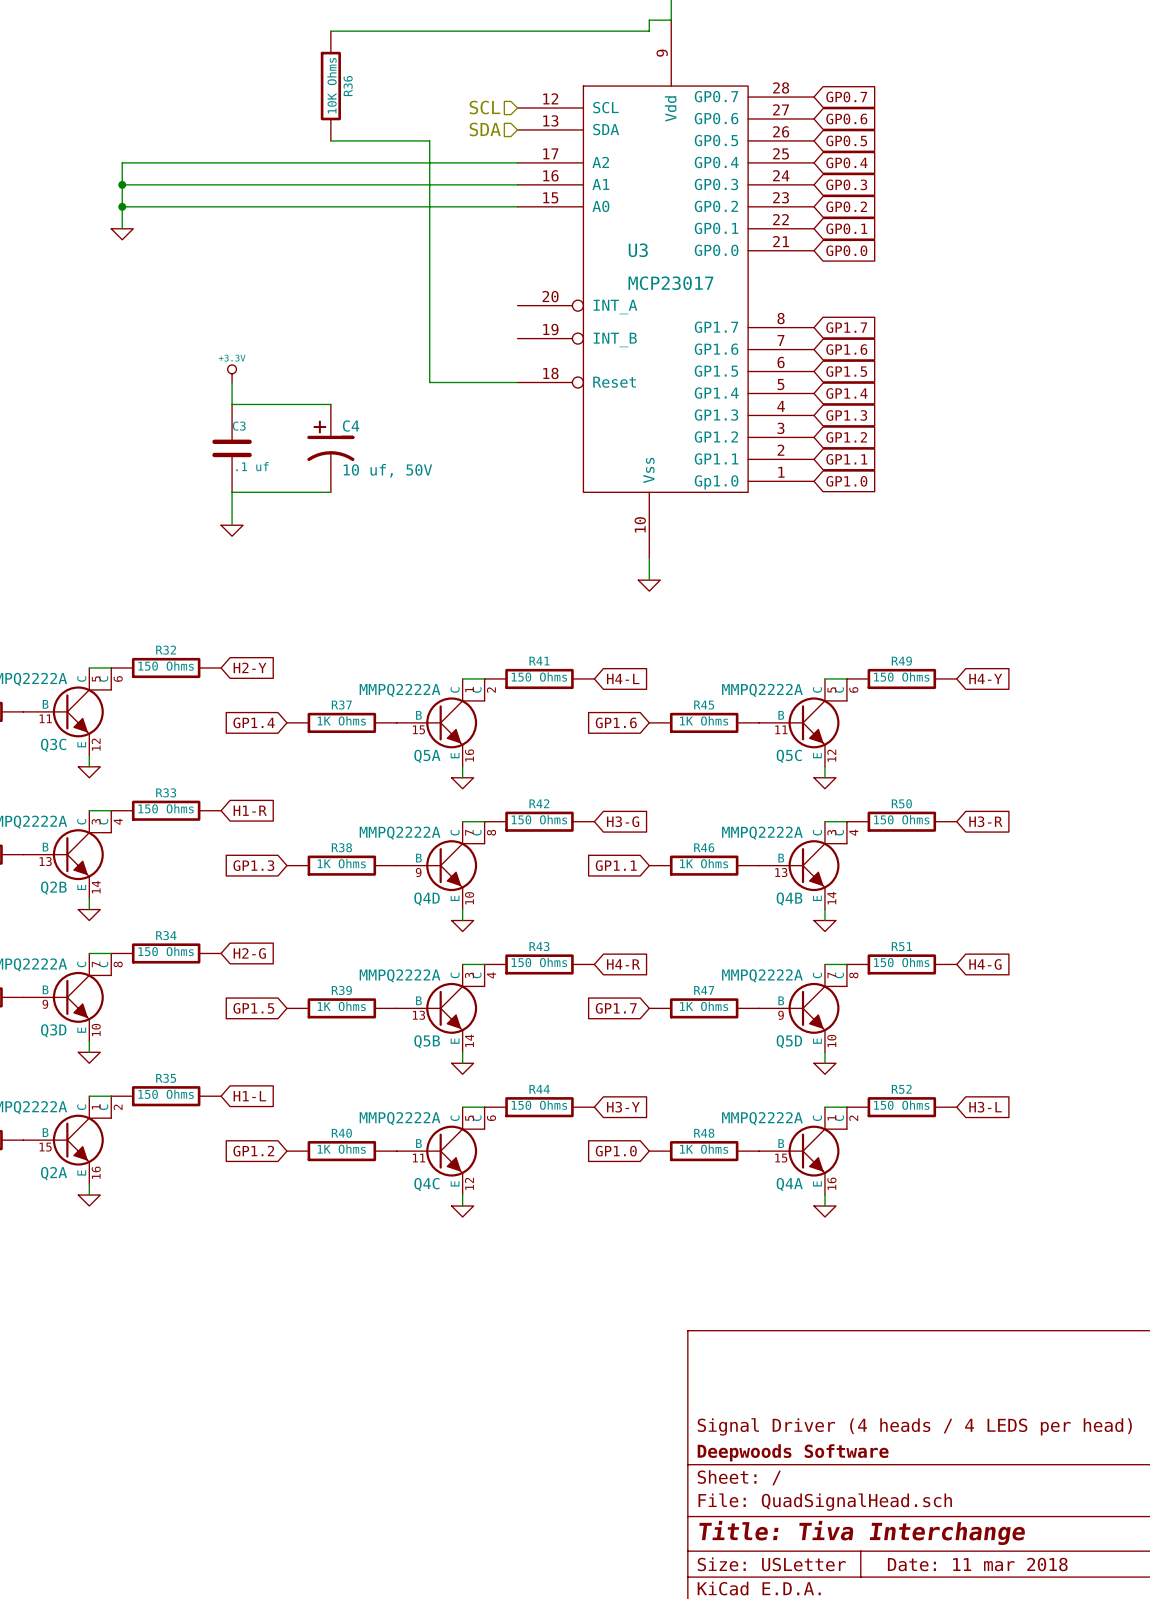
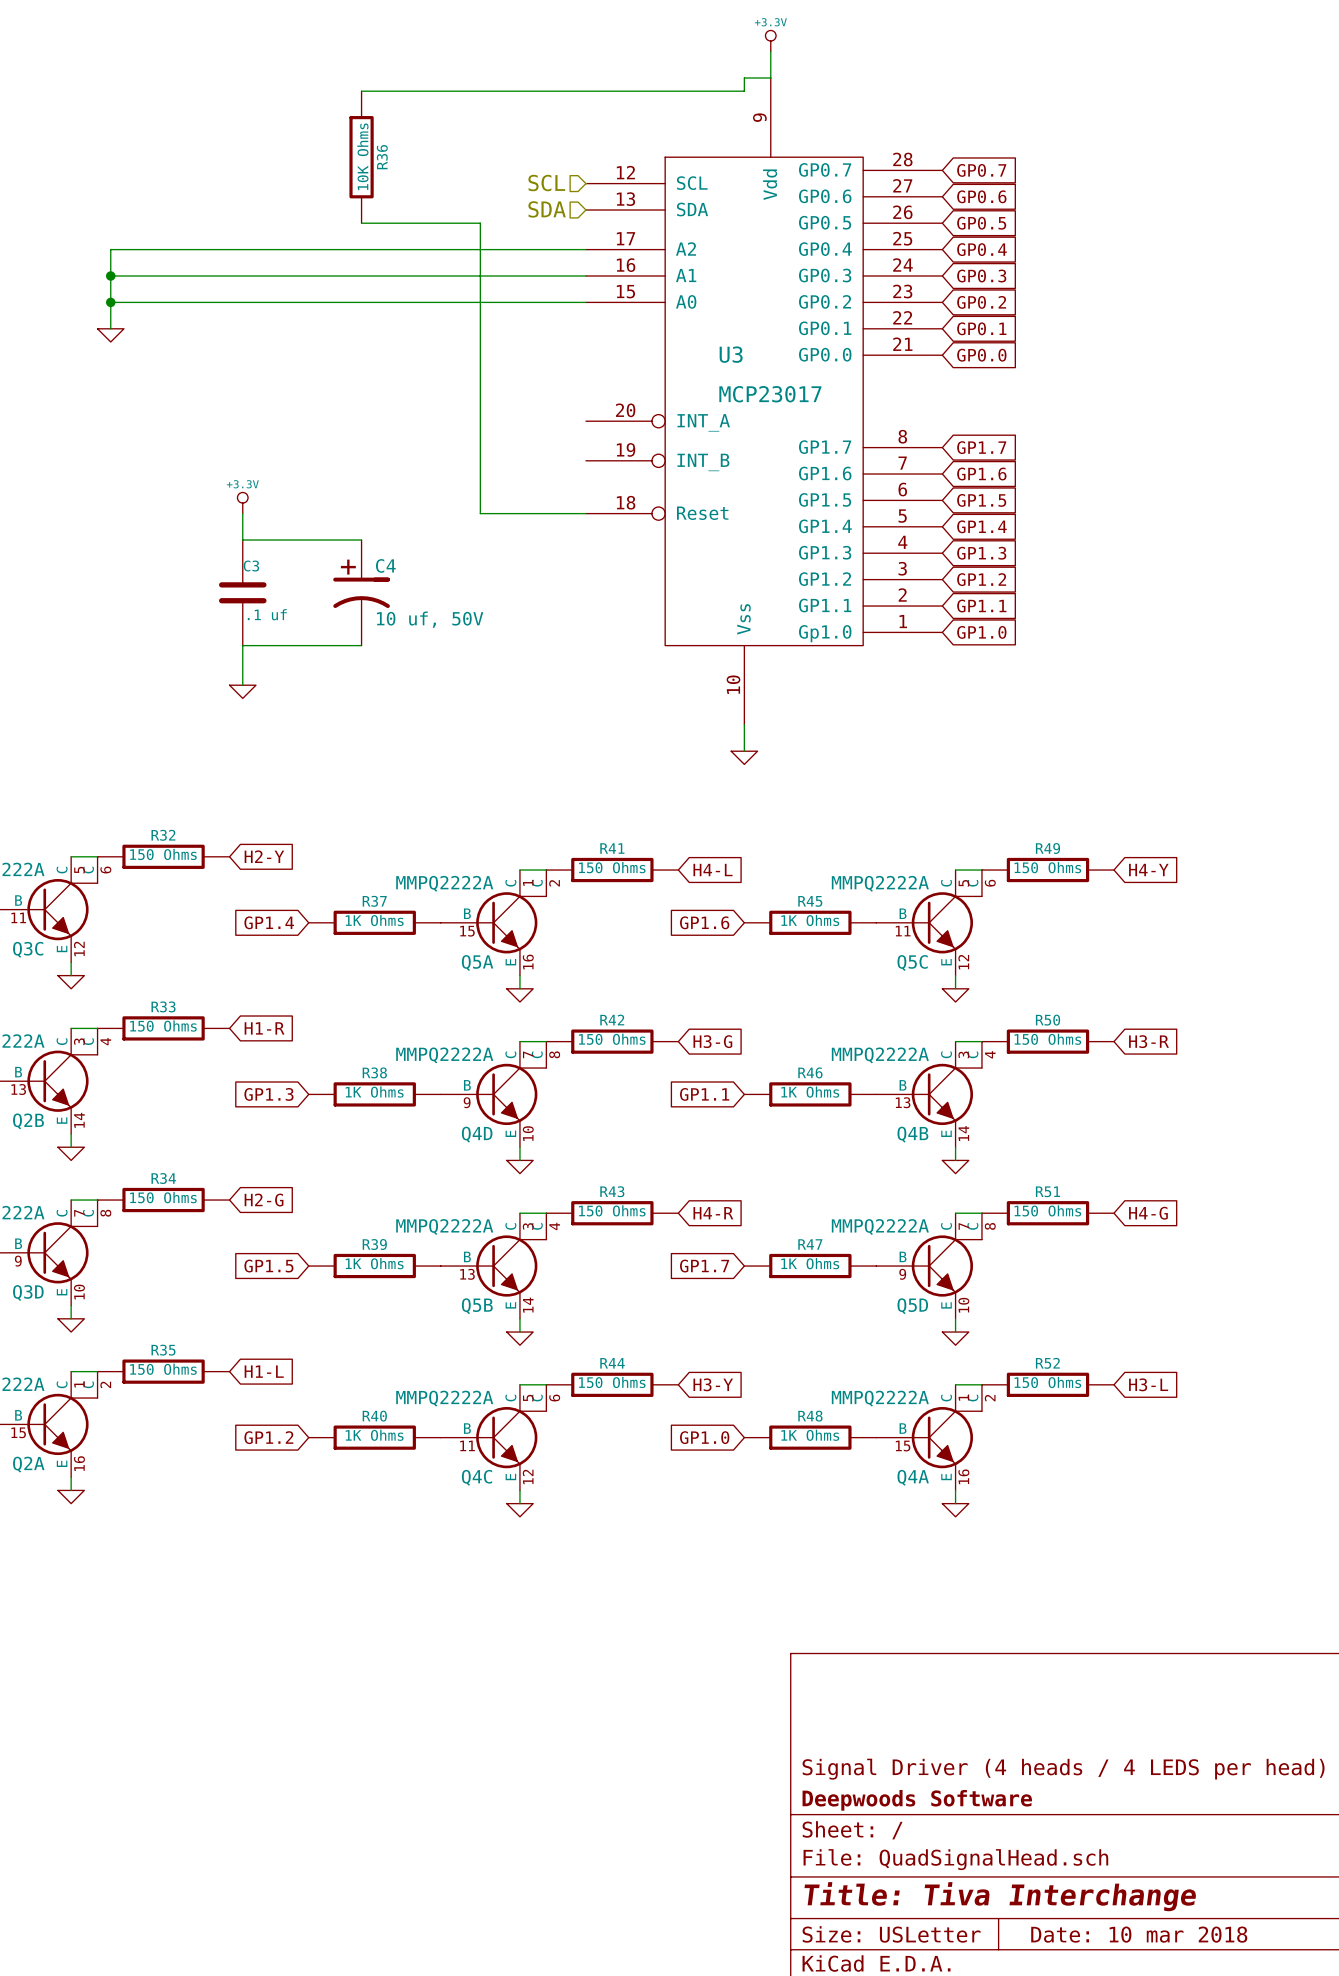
title block: Date: 11 mar 2018 (977, 1564) -> Date: 10 mar 2018 (1139, 1934)

